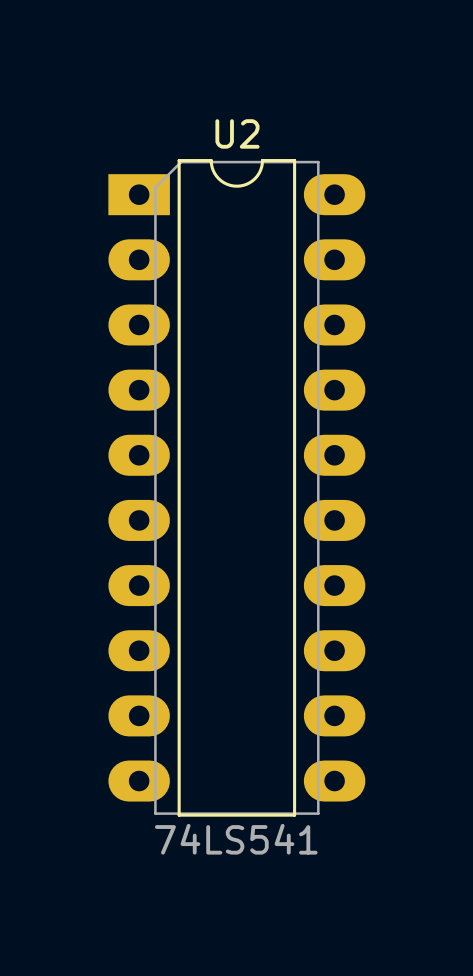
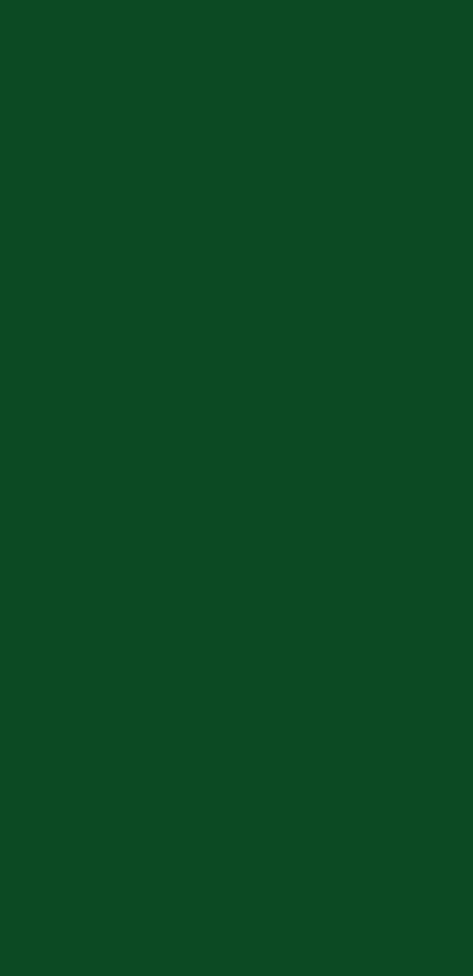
U2: 74LS541 (236, 487) -> none

